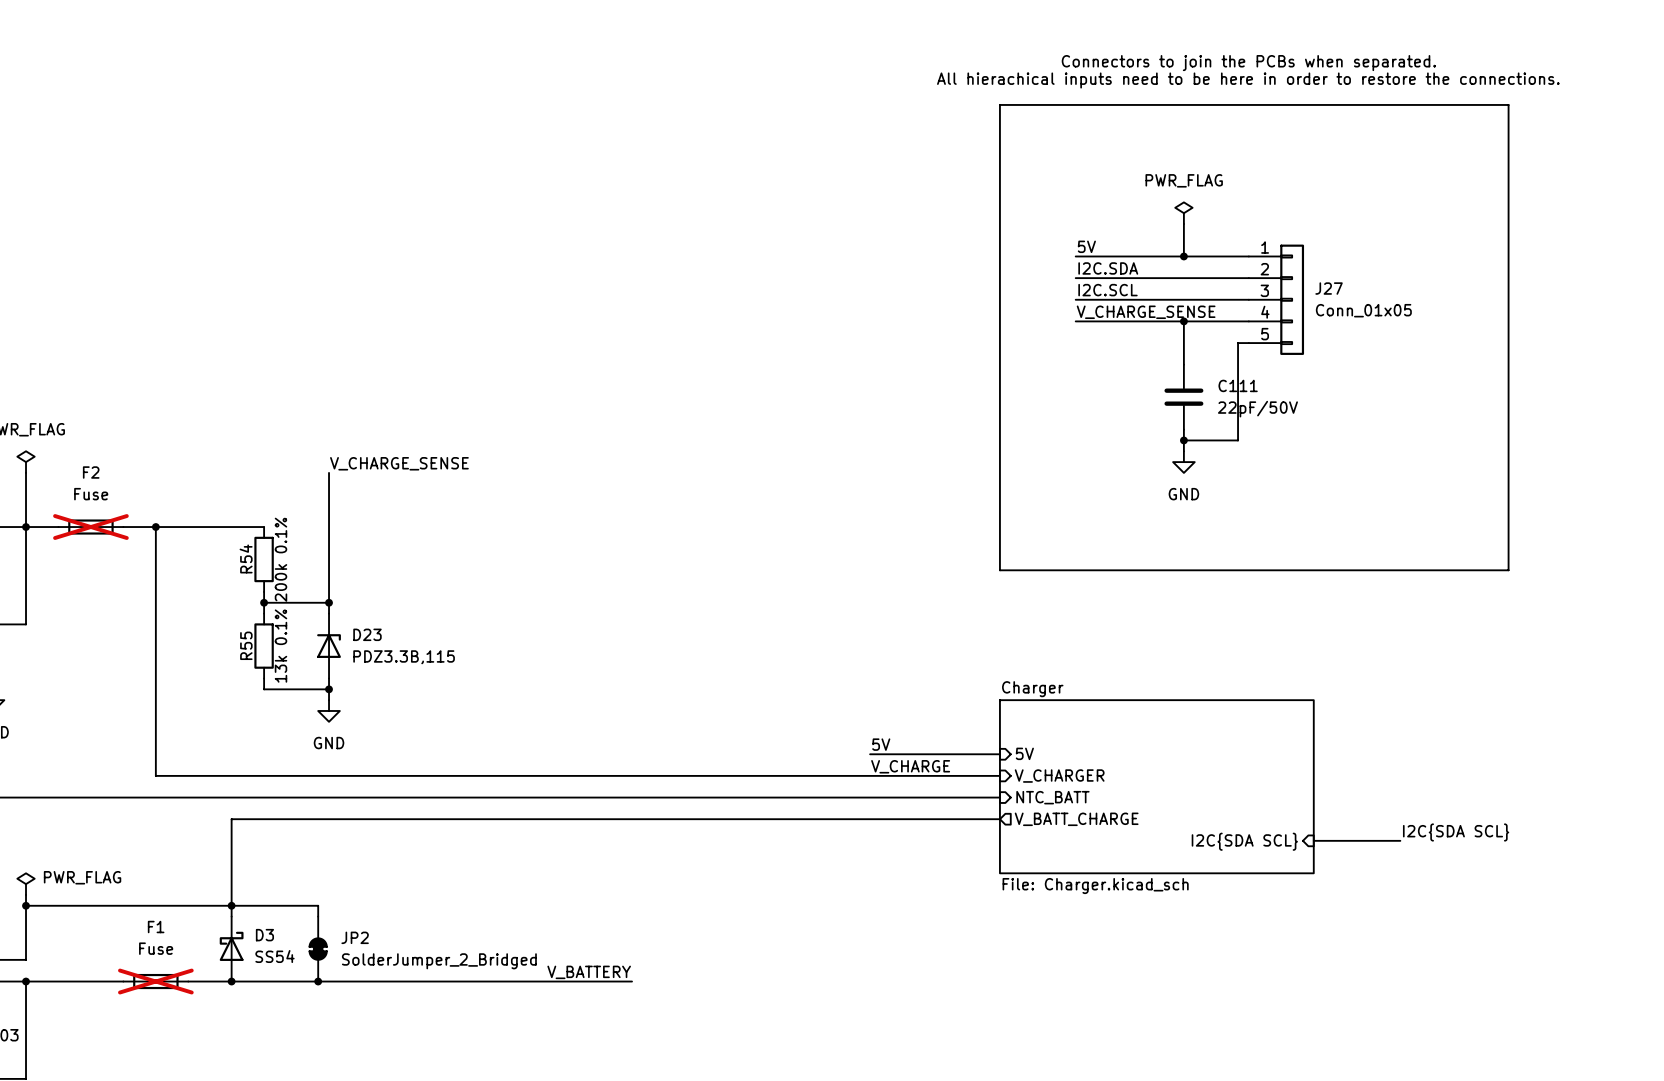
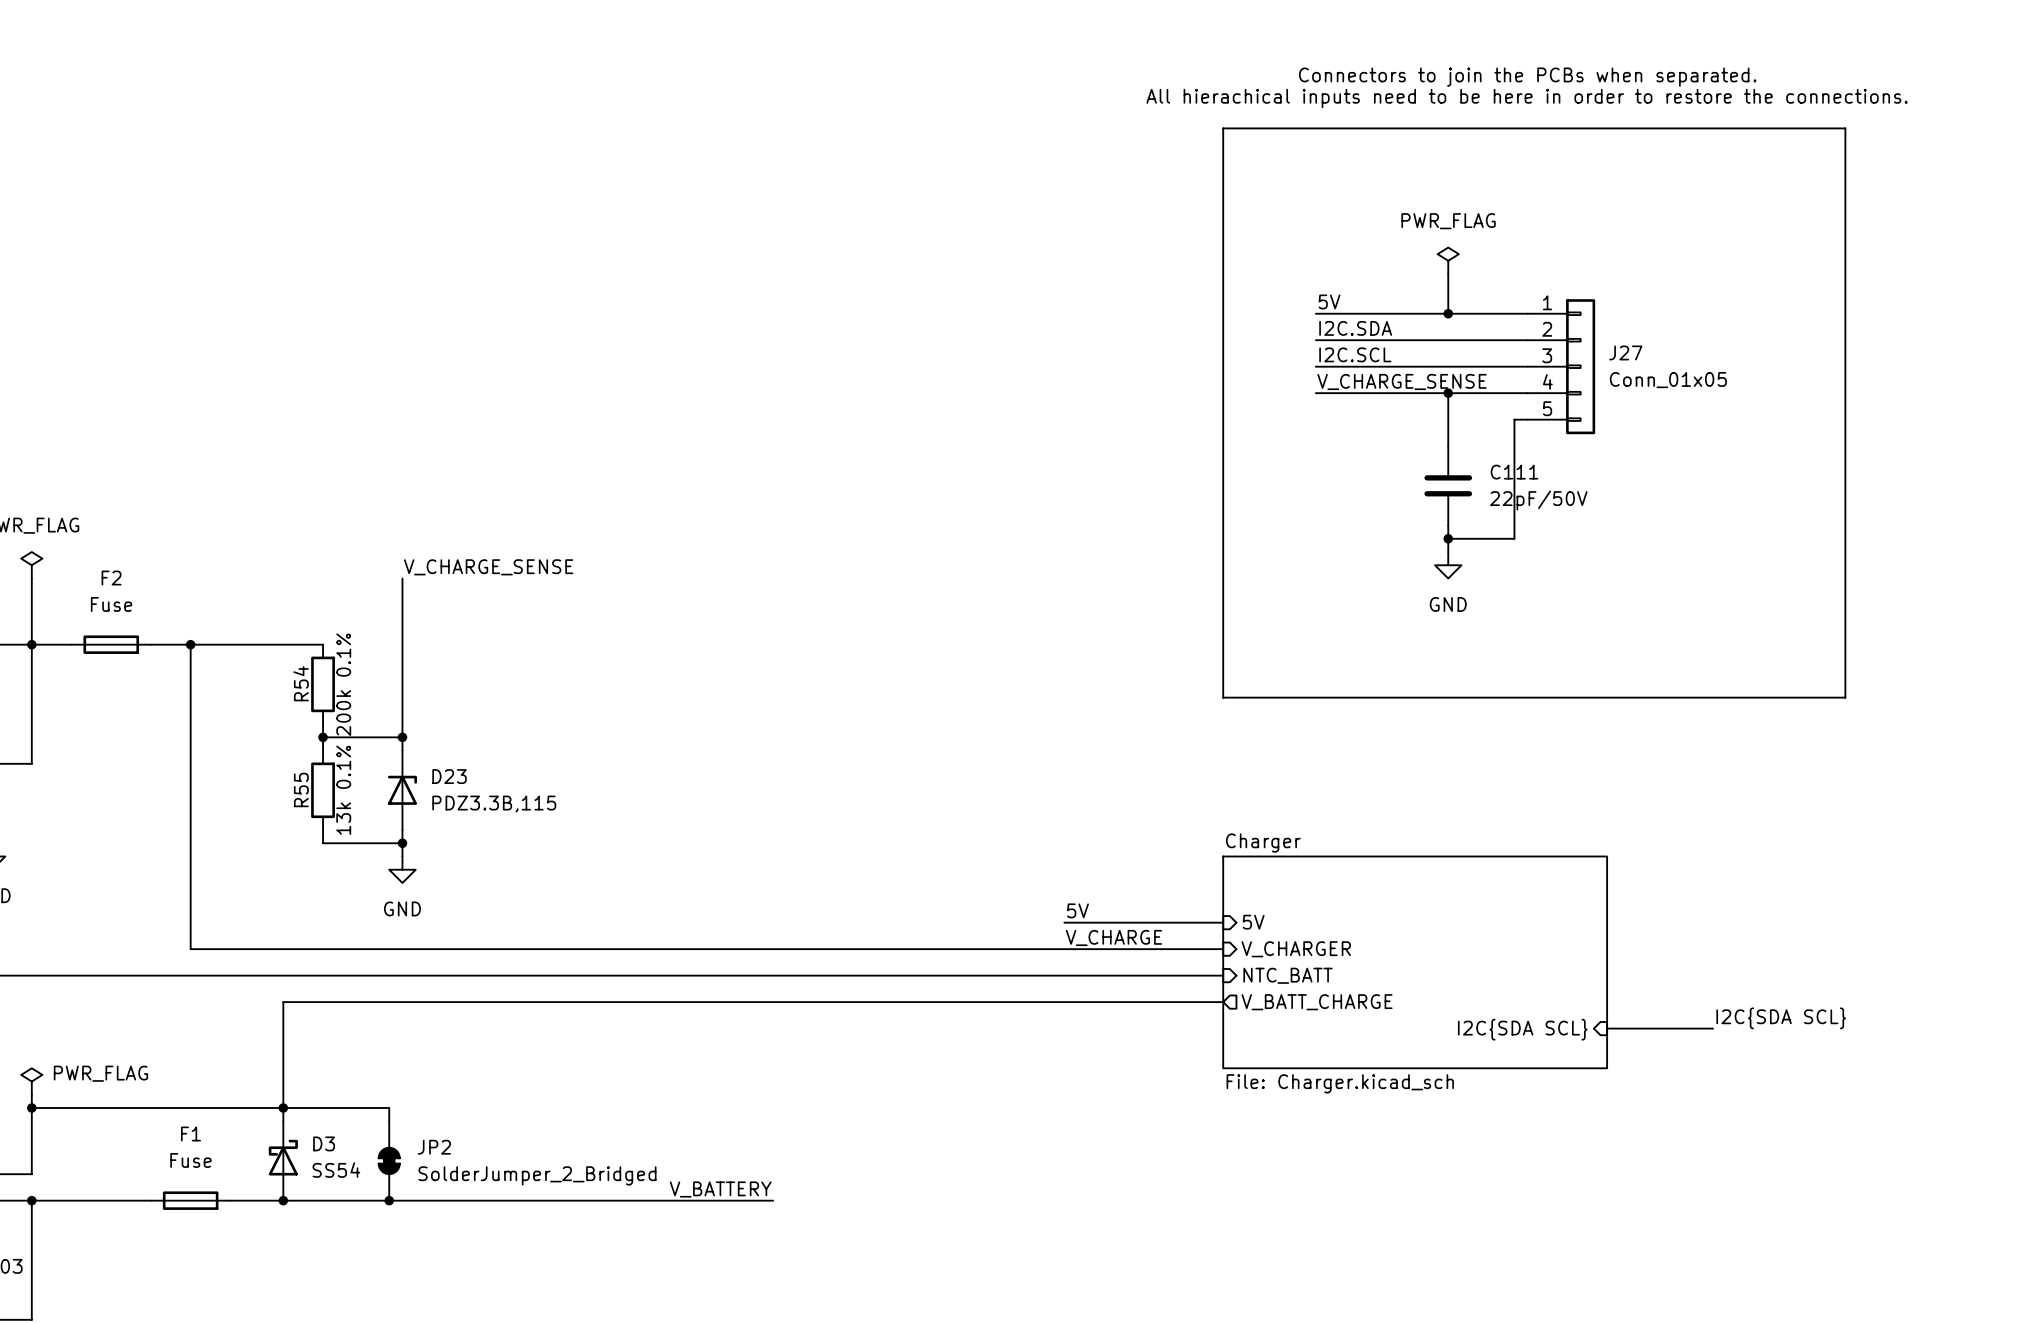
F2 do-not-place cross: (90, 527) -> none
F1 do-not-place cross: (155, 981) -> none

